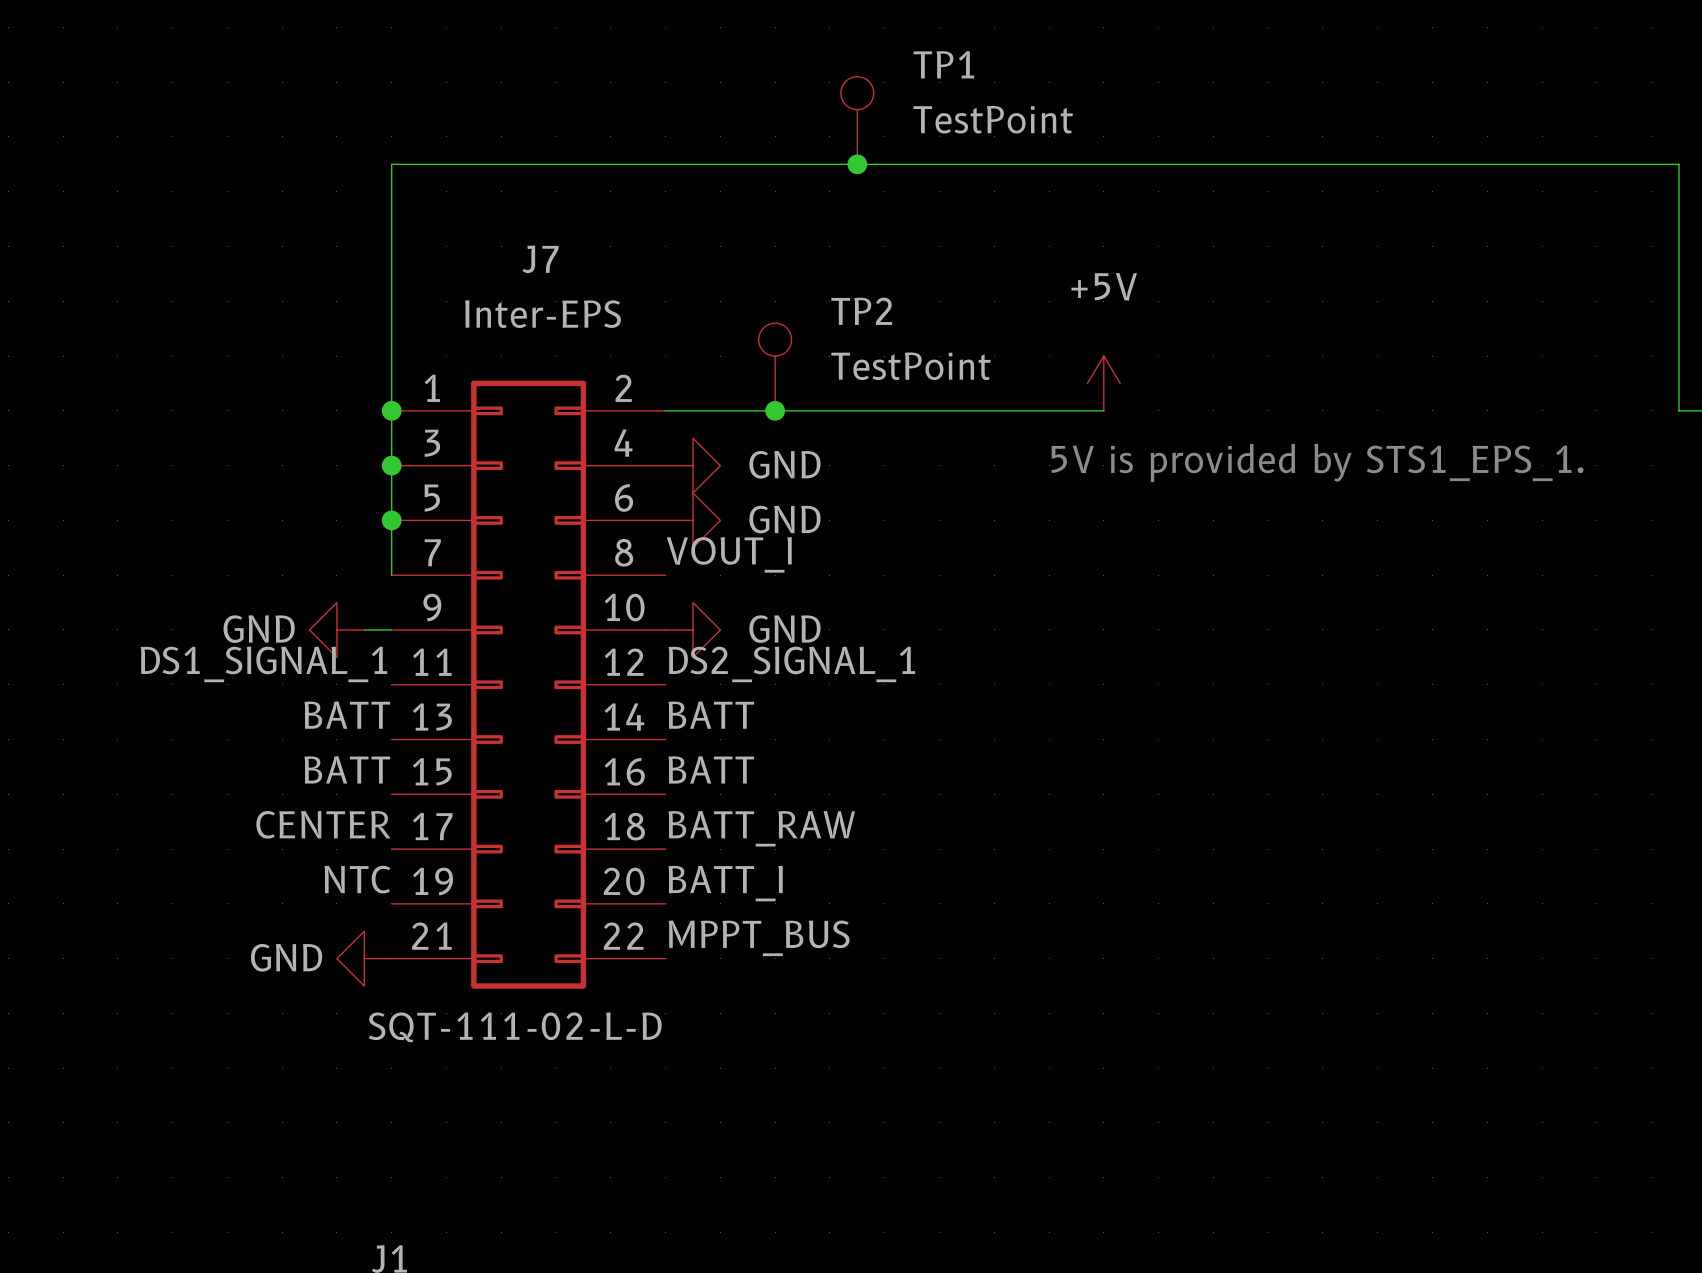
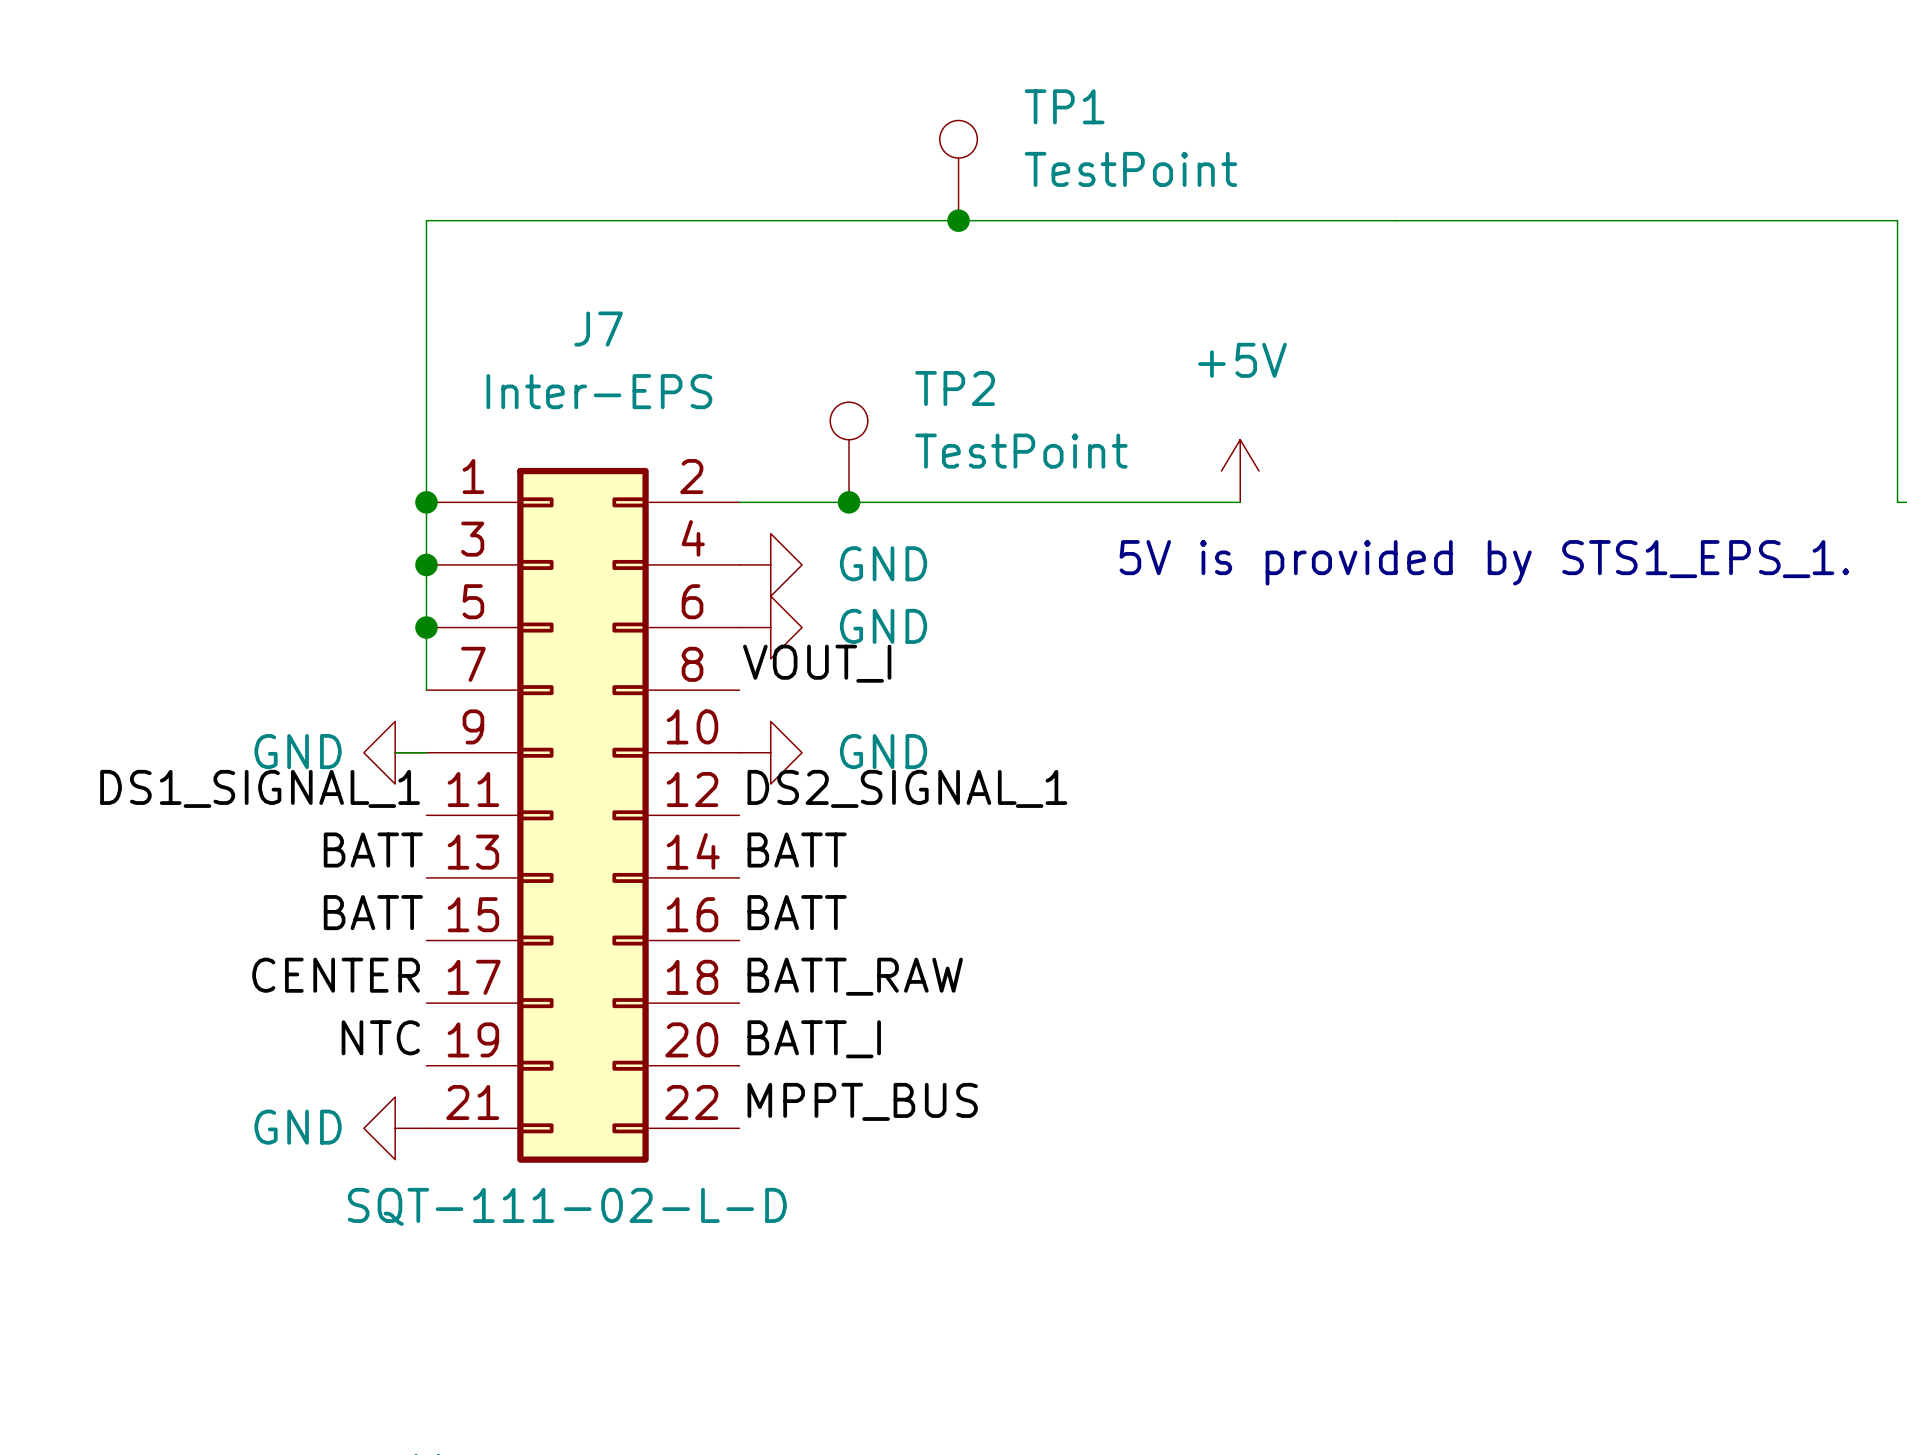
TP2 position: (775, 367) -> (849, 452)
junction position: (775, 410) -> (849, 502)
power symbol position: GND (336, 629) -> GND (395, 752)

